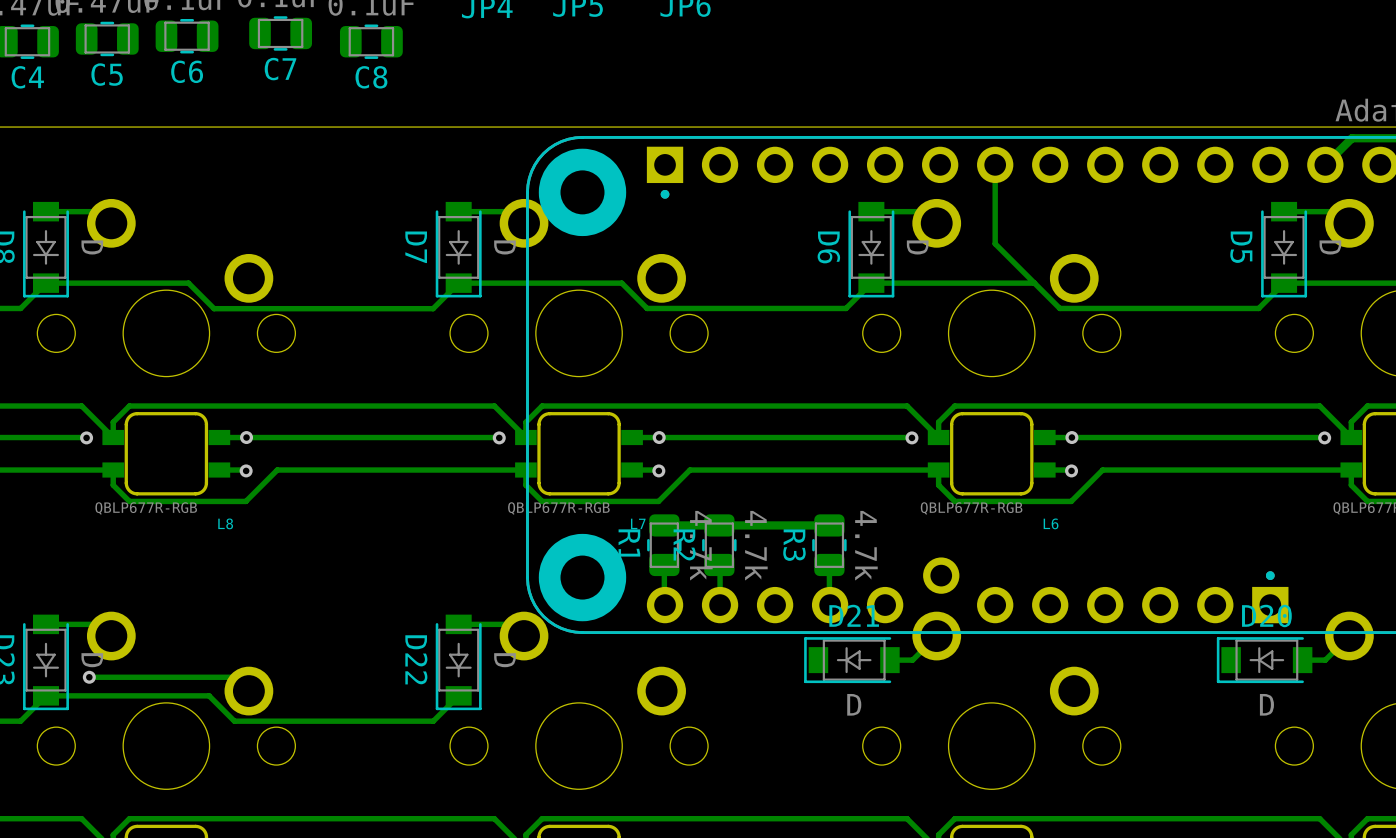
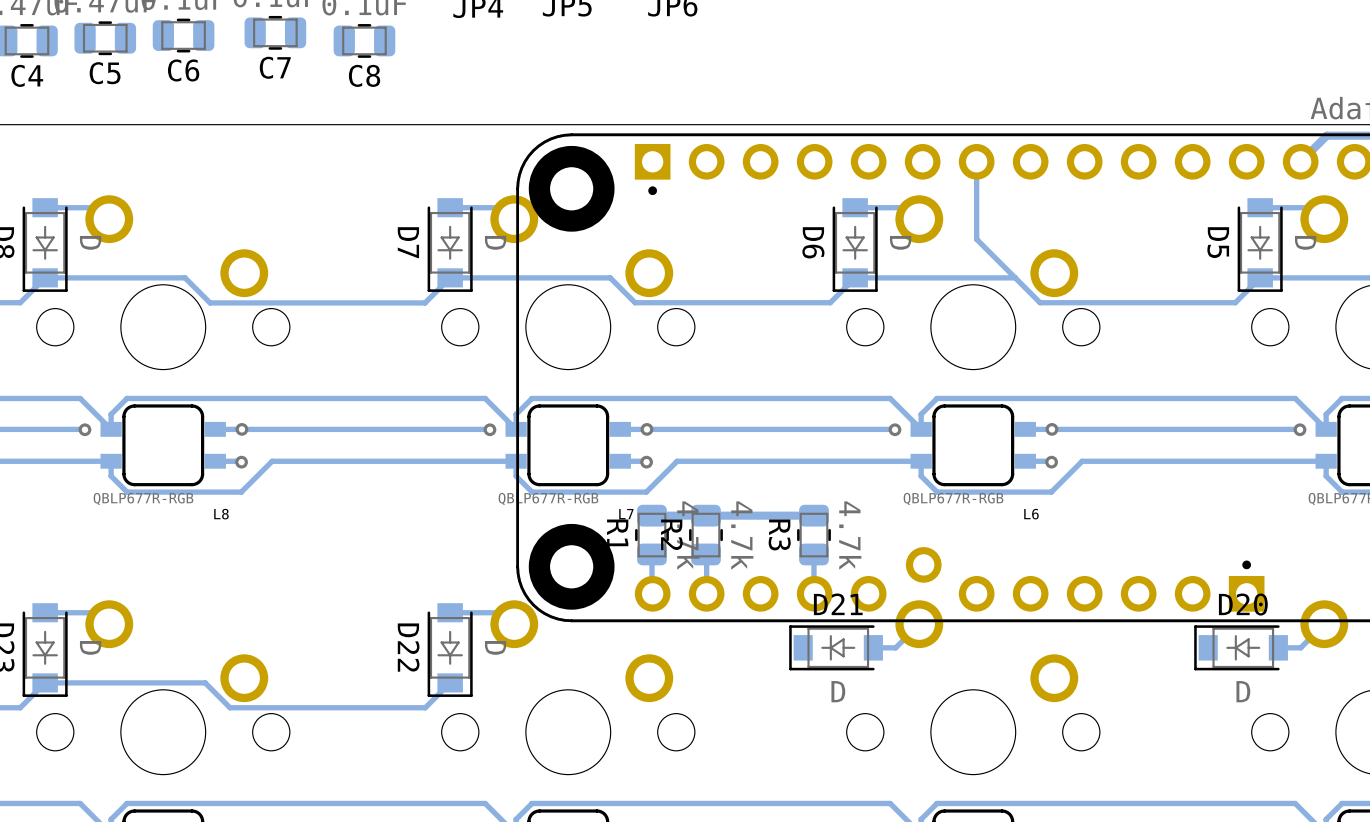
track: (89, 677) (235, 677) (248, 691) -> none
via: (89, 677) -> none

